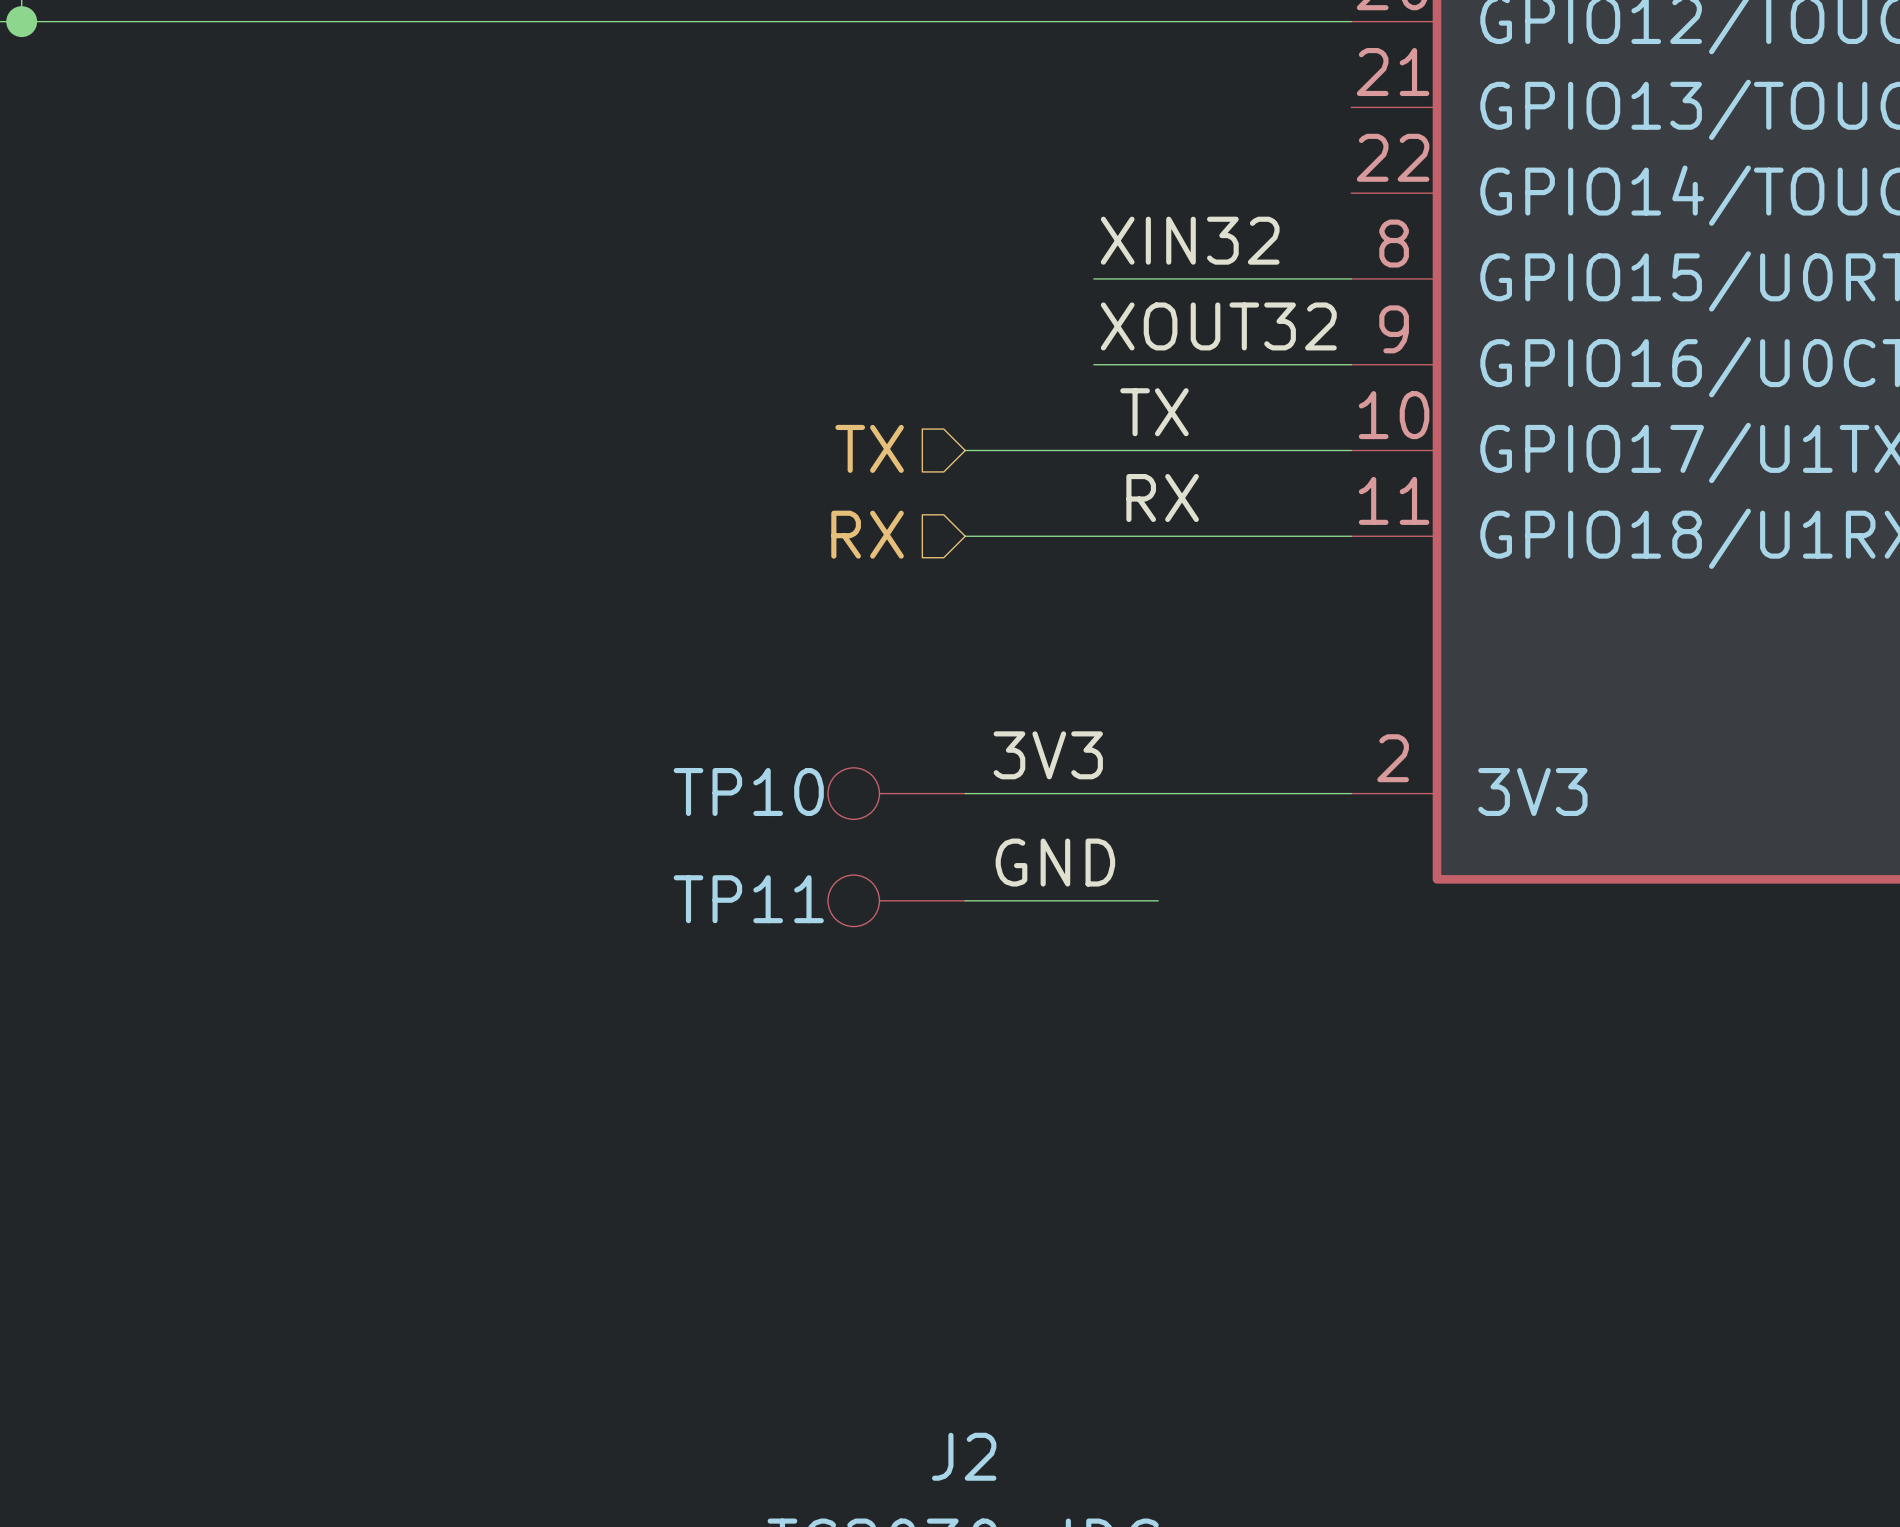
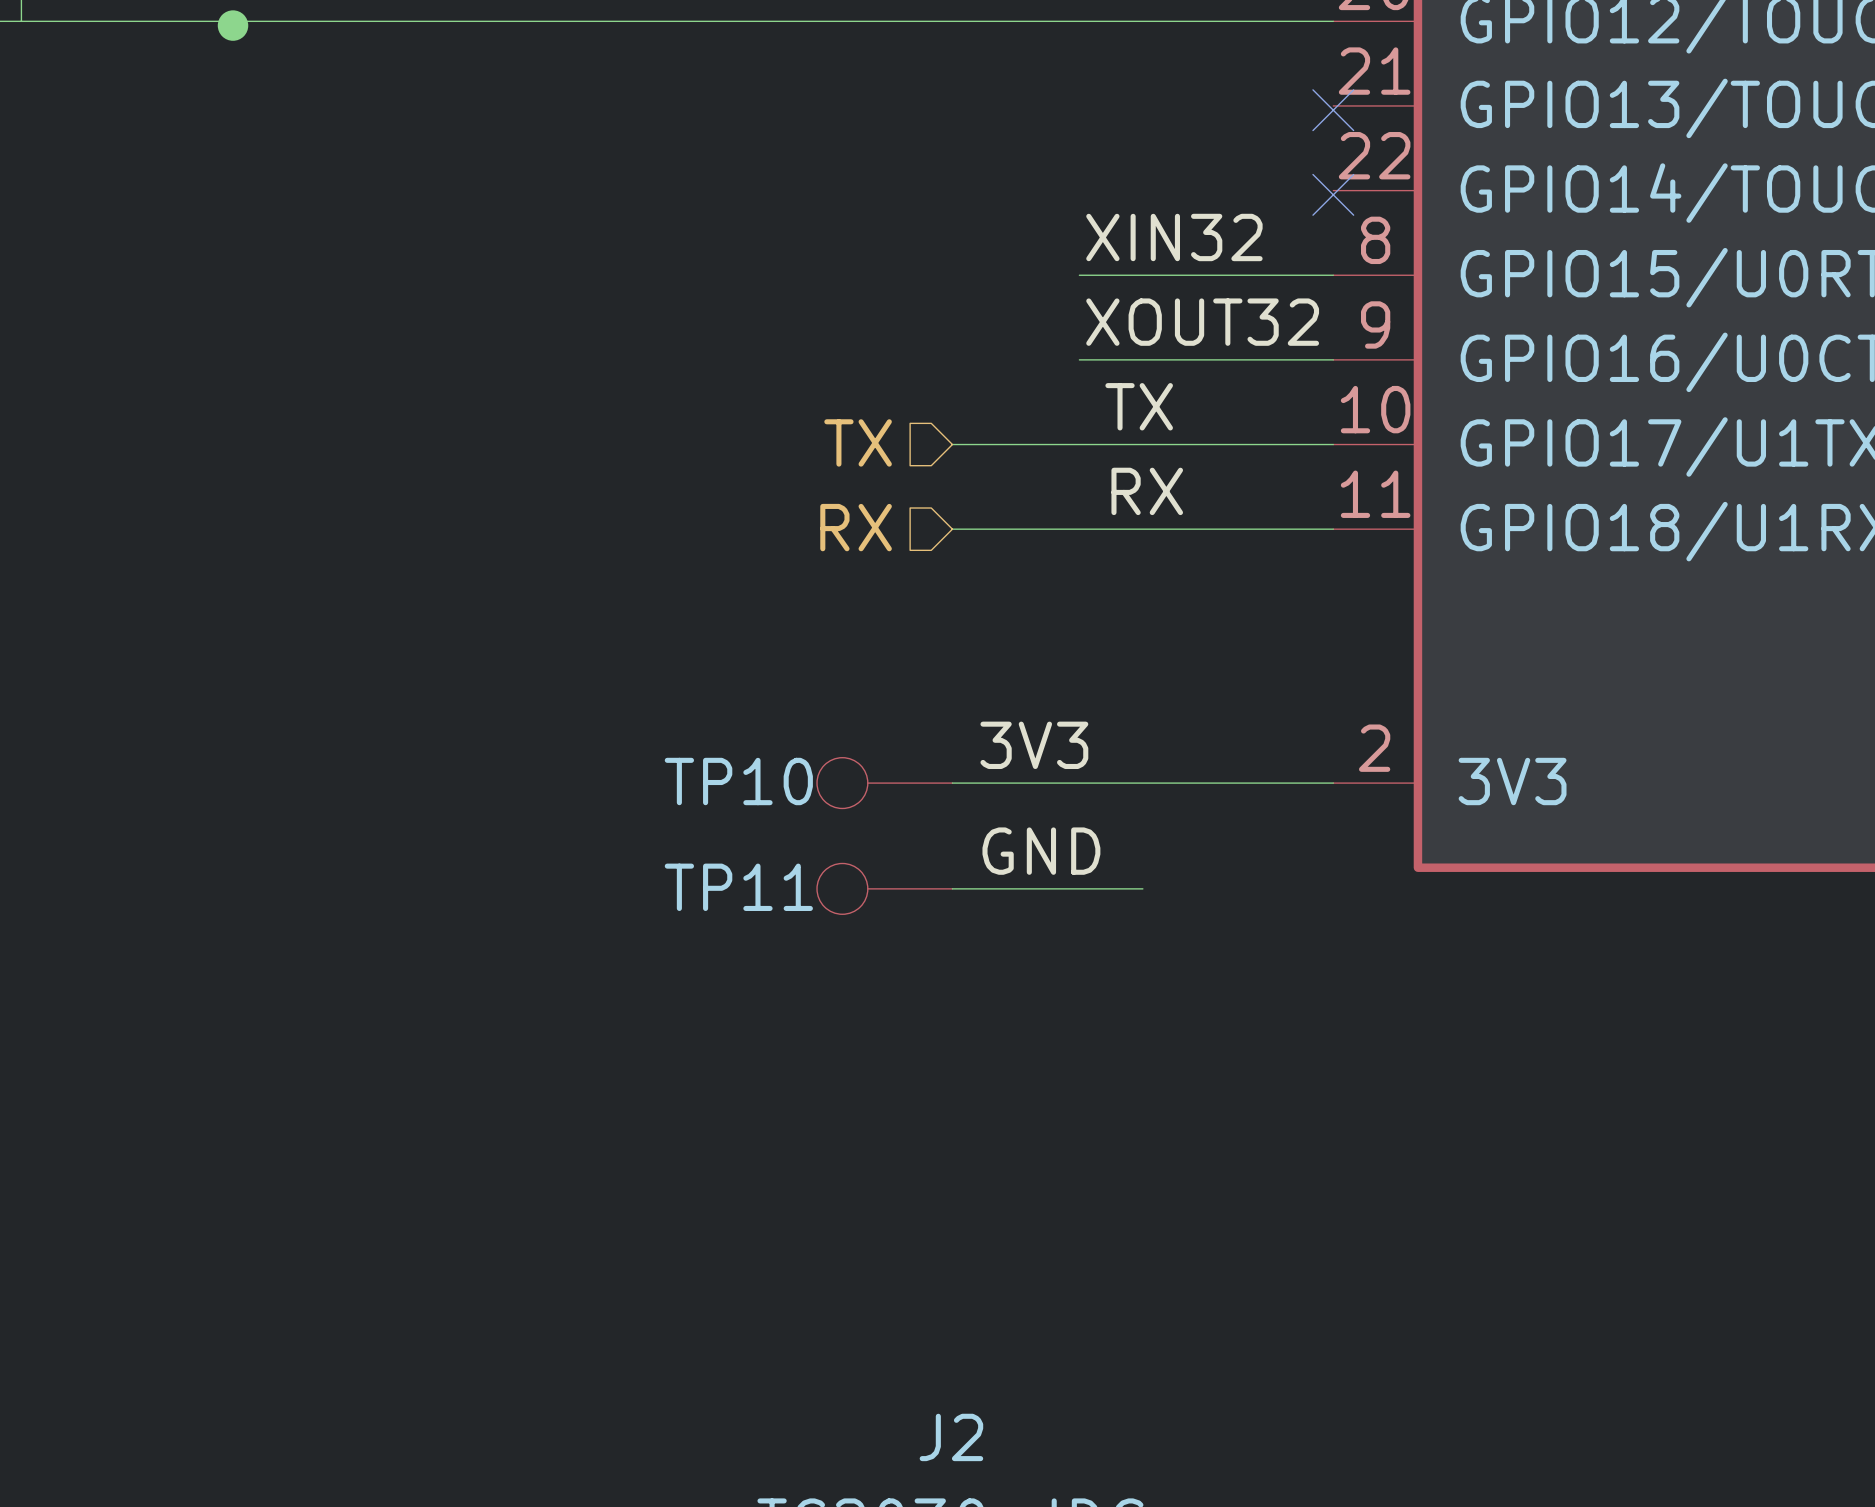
junction: (21, 21) -> none
junction: none -> (233, 25)
no-connect mark: none -> (1333, 110)
no-connect mark: none -> (1333, 194)

